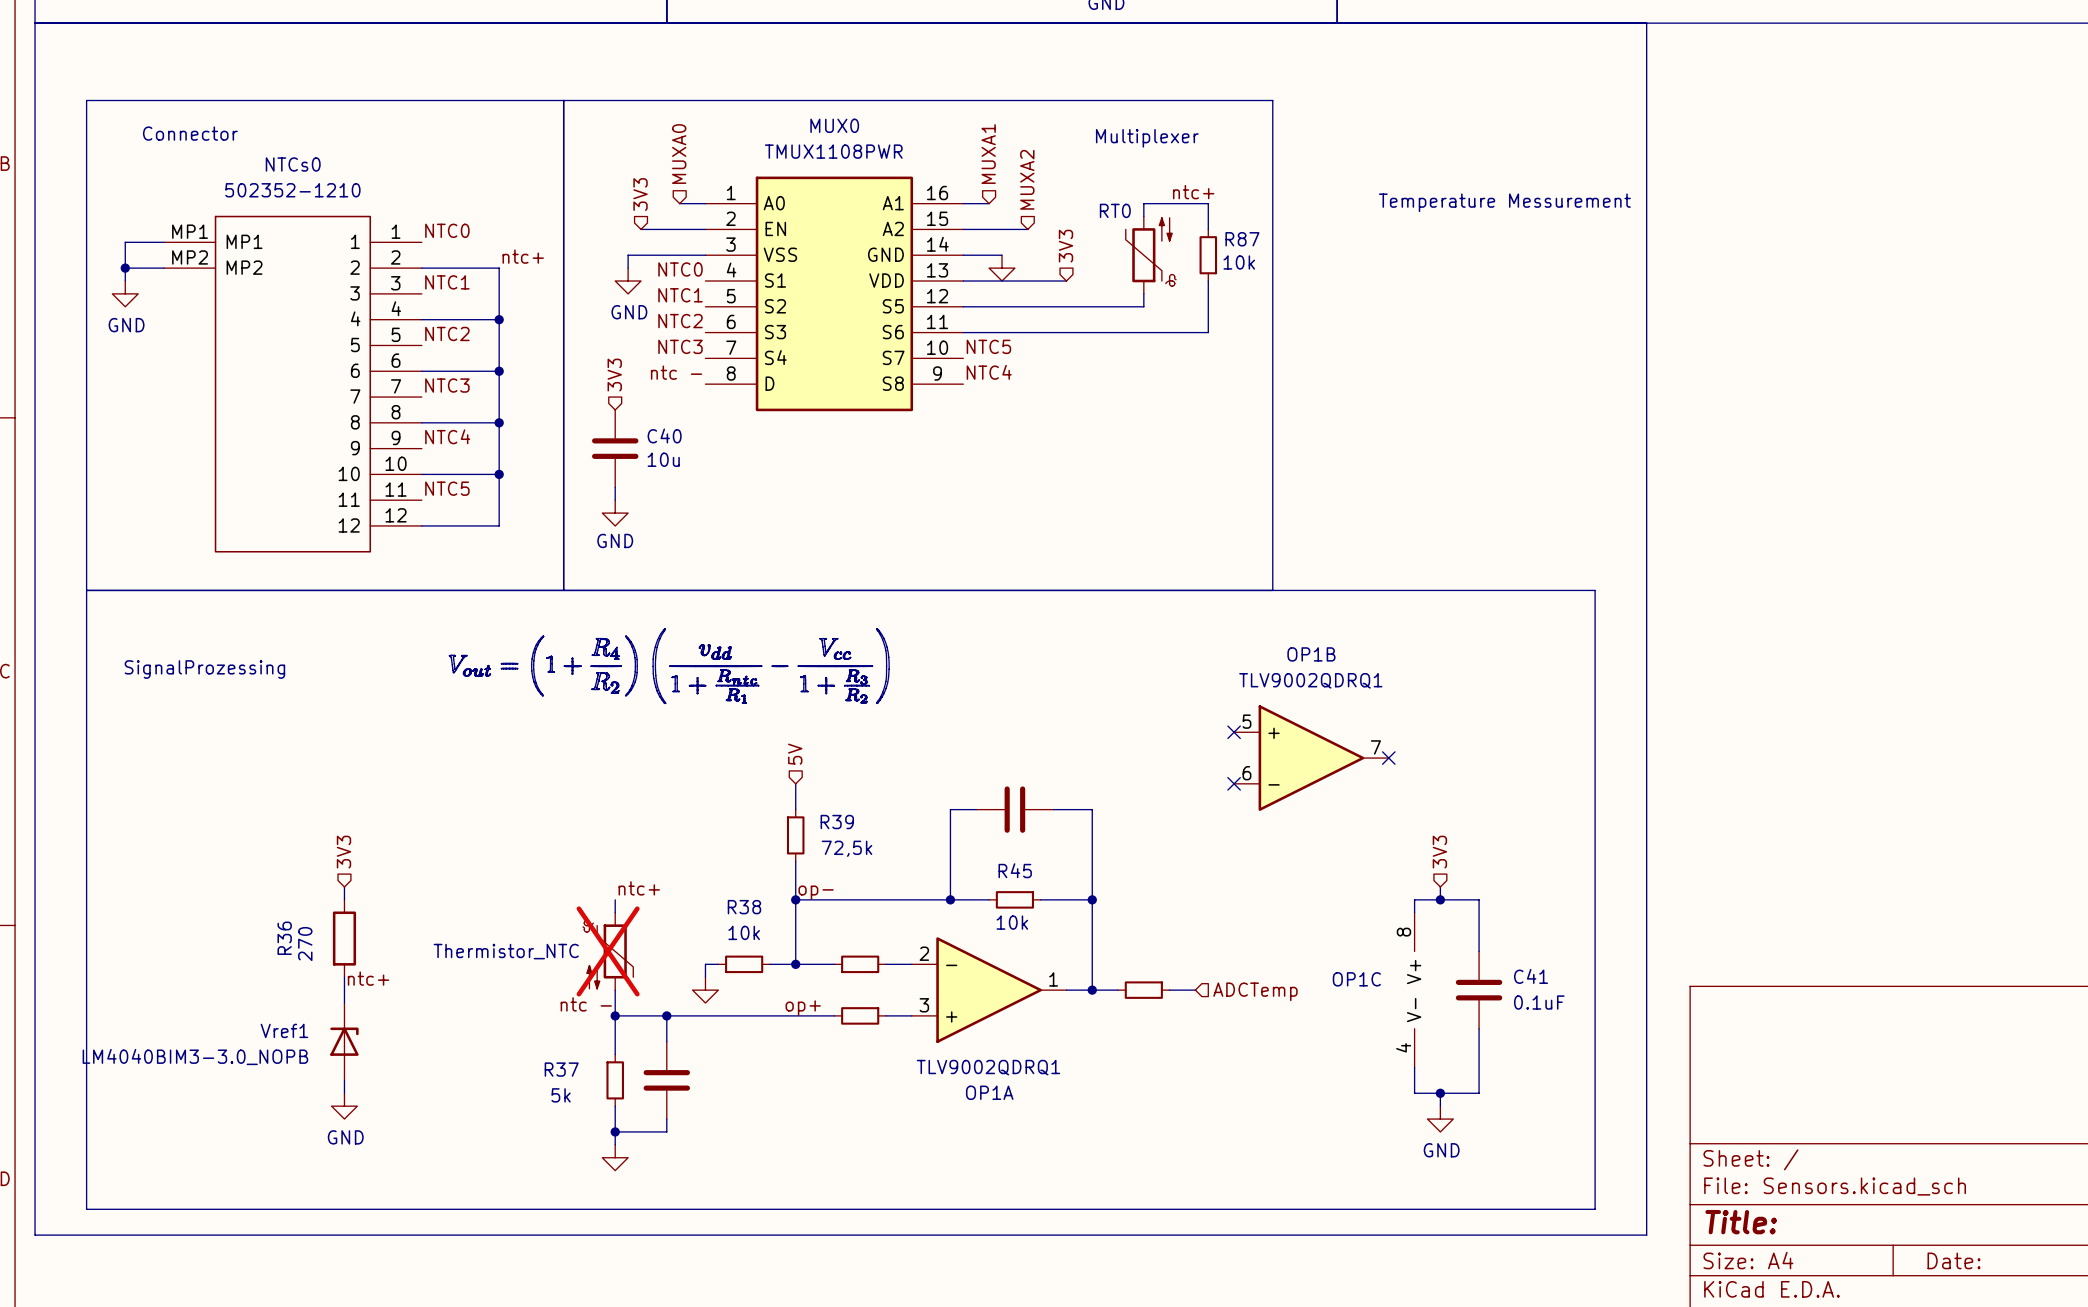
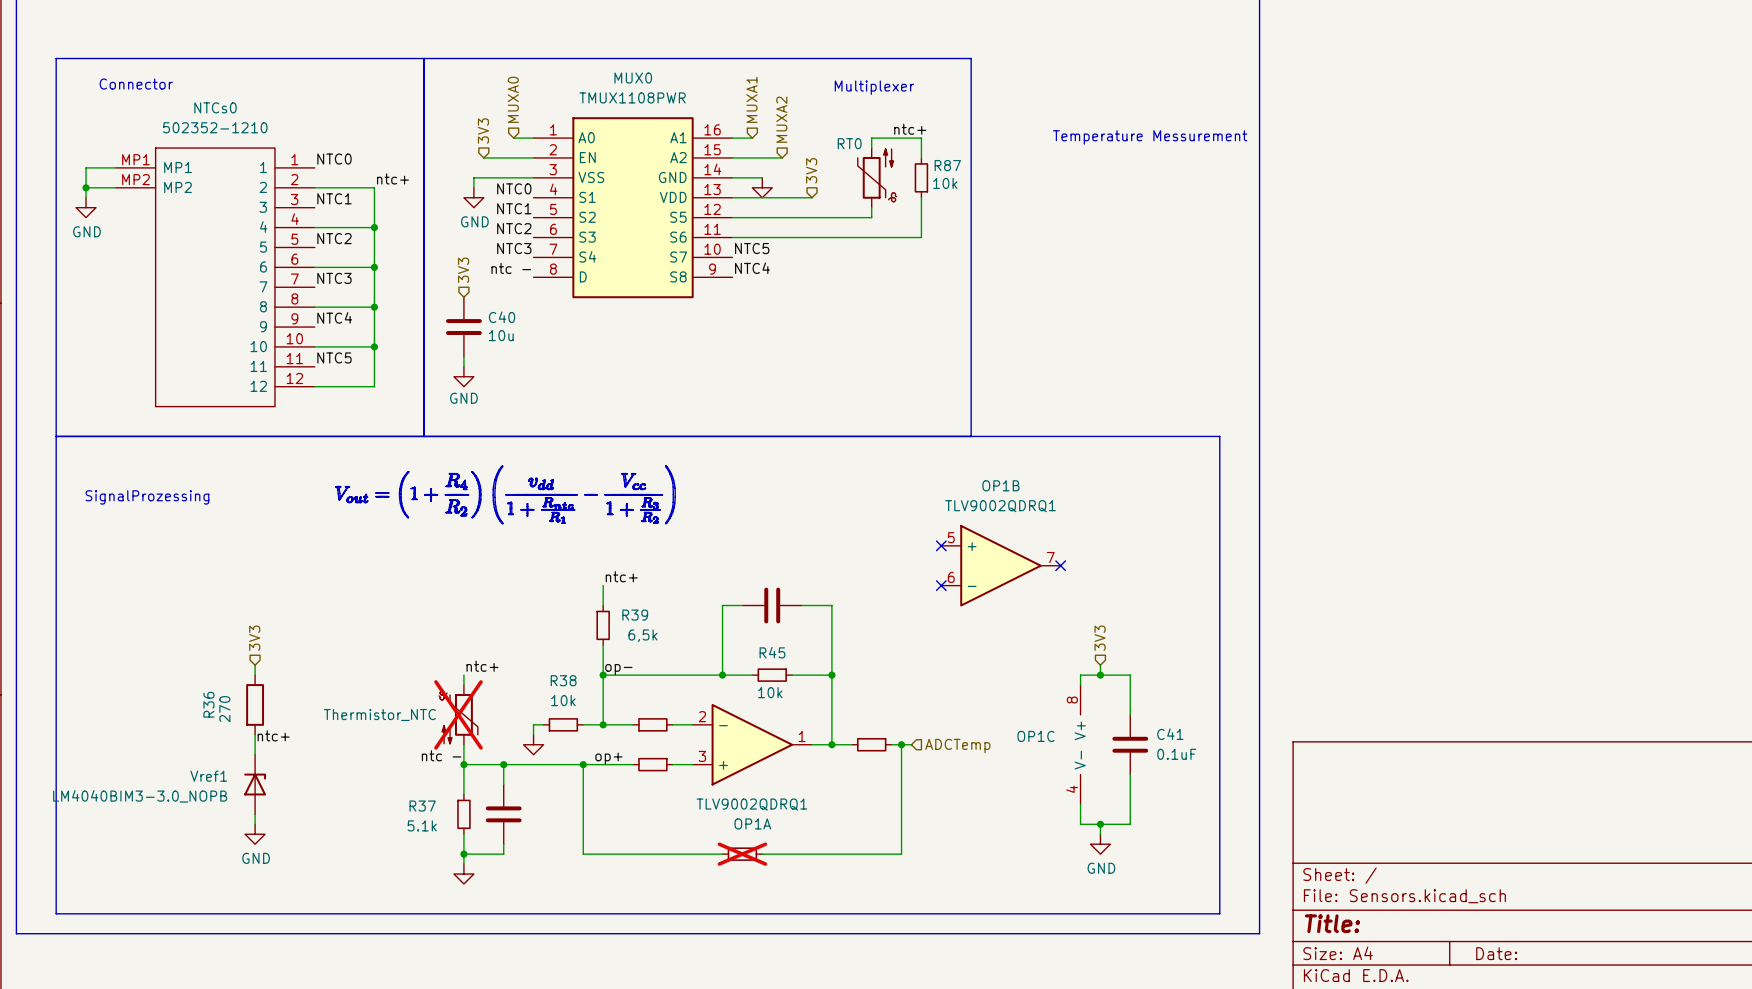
hierarchical label: 5V (795, 754) -> none
label: none -> ntc+ (621, 576)
R39 value: 72,5k (846, 848) -> 6,5k (642, 635)
wire: none -> (901, 744) (901, 854) (762, 854)
junction: none -> (901, 744)
wire: none -> (583, 764) (583, 854) (722, 854)
junction: none -> (583, 764)
R37 value: 5k (561, 1095) -> 5.1k (422, 825)
part: none -> (742, 854)

